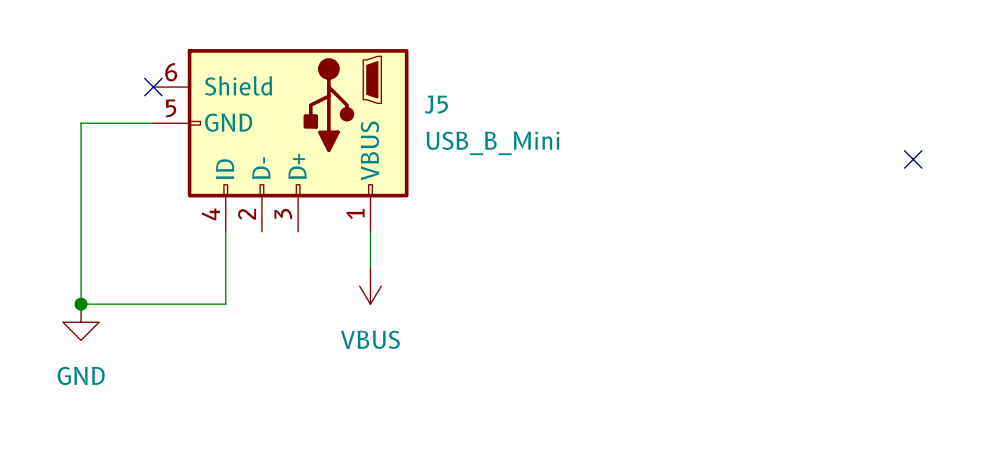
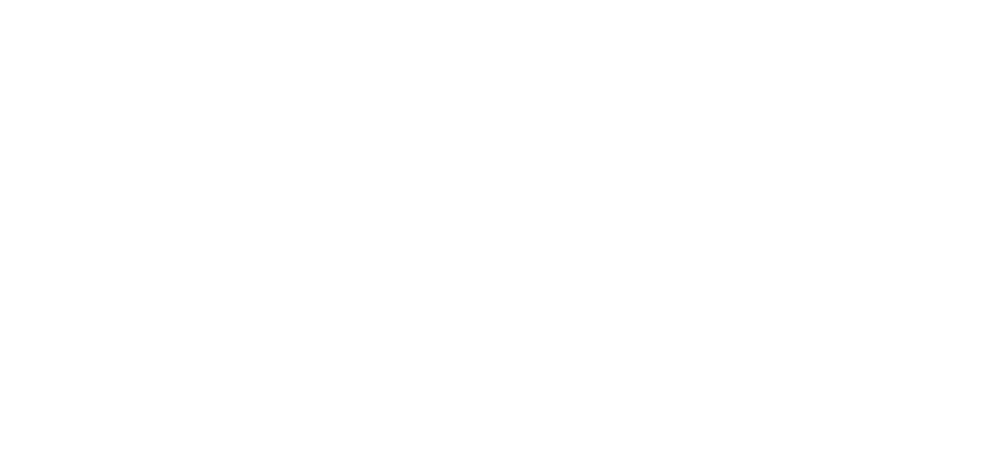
no-connect mark: (153, 87) -> none
wire: (153, 123) (81, 123) (81, 304) (225, 304) (225, 231) -> none
J5: USB_B_Mini (280, 140) -> none
no-connect mark: (913, 159) -> none
wire: (370, 231) (370, 267) -> none
power symbol: VBUS (370, 286) -> none
junction: (81, 304) -> none
power symbol: GND (81, 322) -> none

